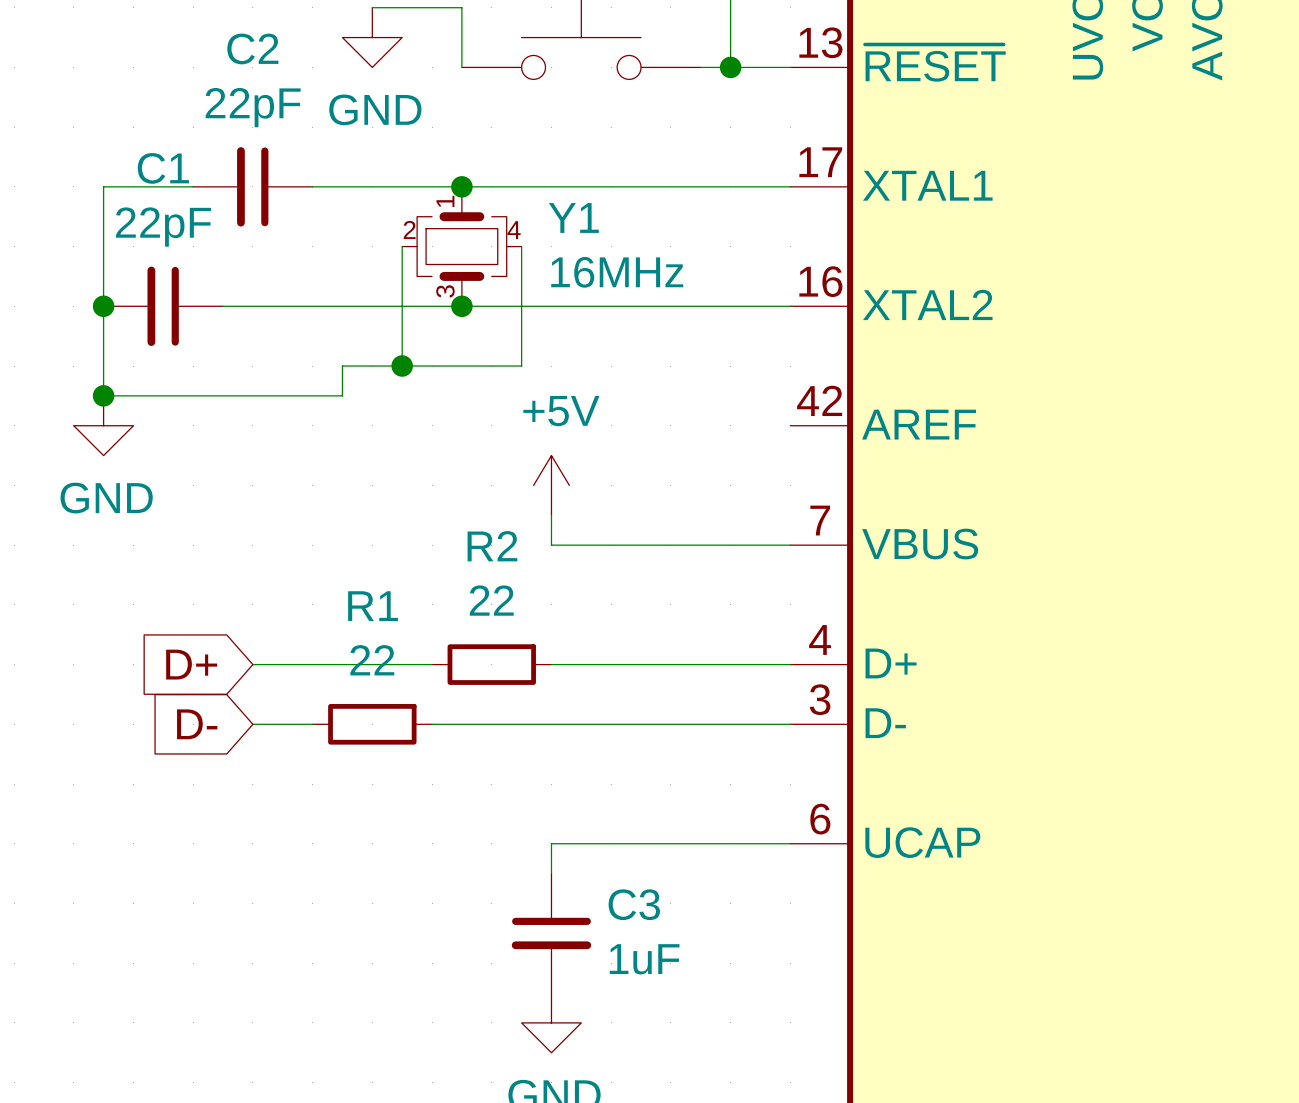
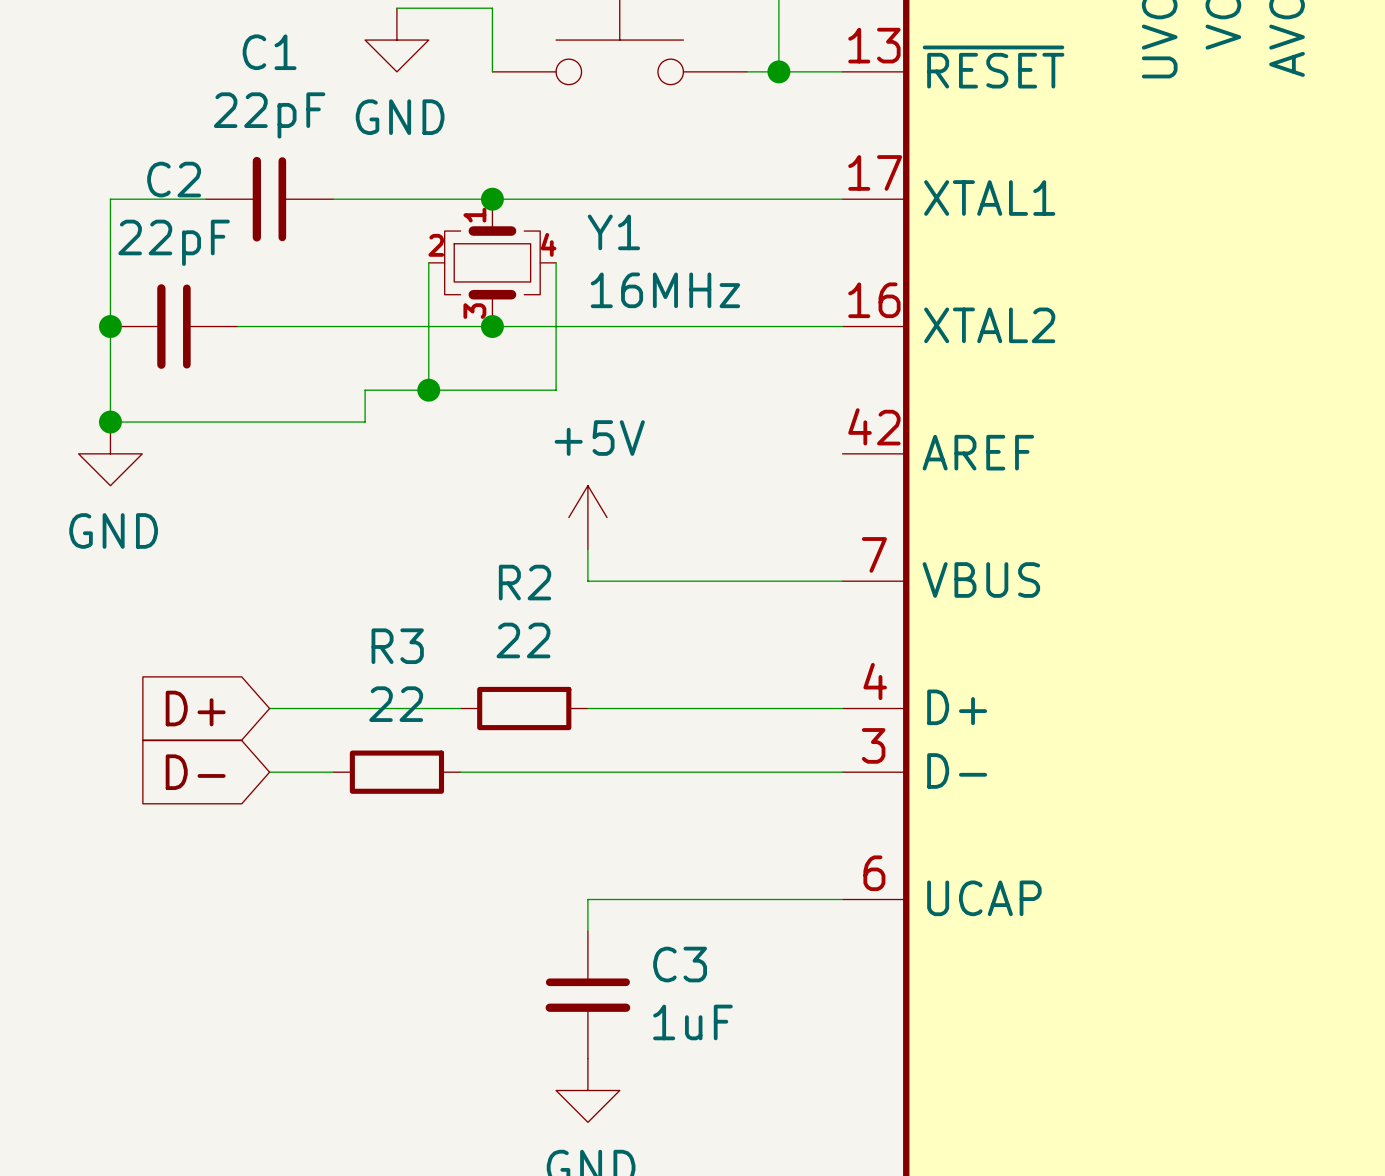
C2 name: C2 (252, 48) -> C1 (269, 52)
C1 name: C1 (163, 168) -> C2 (174, 179)
R1 name: R1 (373, 606) -> R3 (397, 646)

